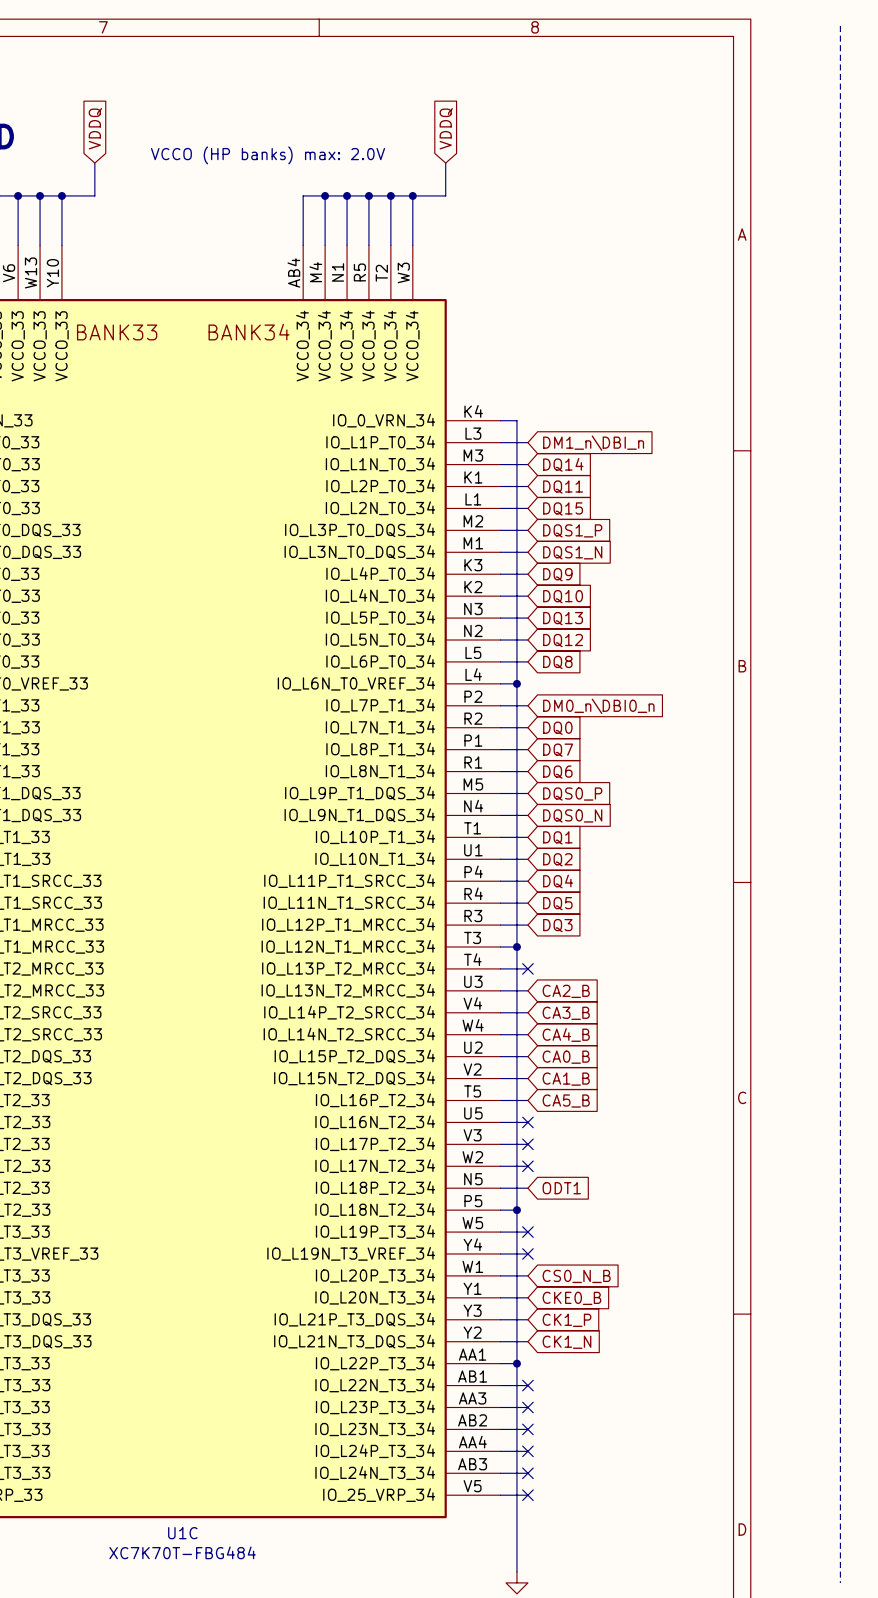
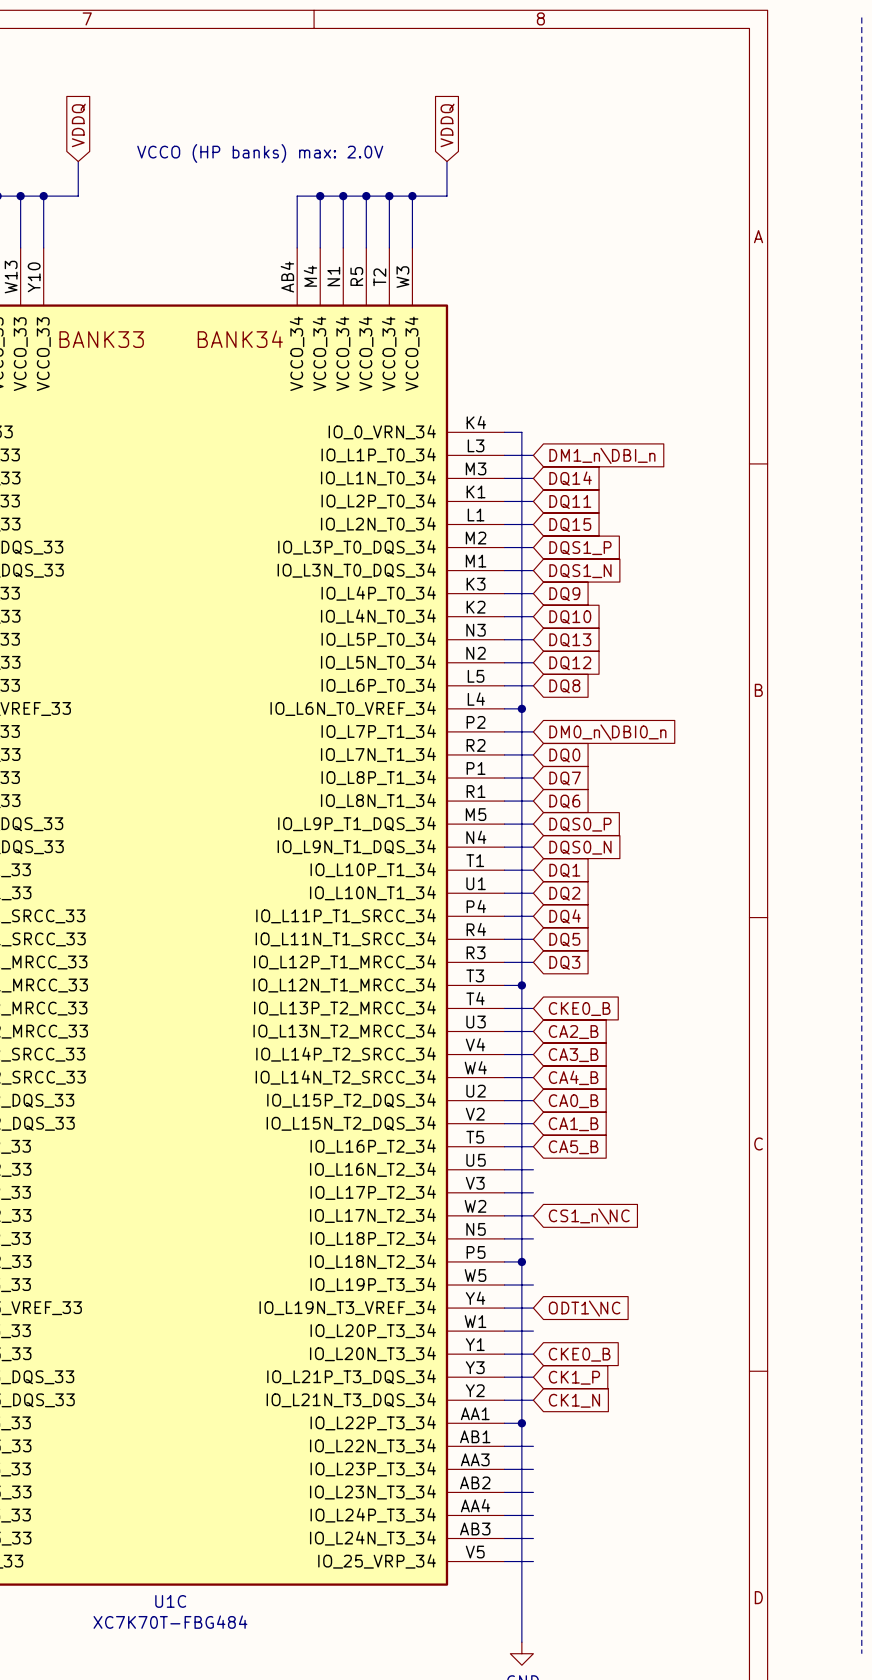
no-connect mark: (527, 968) -> none
global label: none -> CKE0_B (579, 1009)
no-connect mark: (527, 1122) -> none
no-connect mark: (527, 1144) -> none
no-connect mark: (527, 1166) -> none
global label: none -> CS1_n\NC (589, 1216)
global label: ODT1 (561, 1188) -> none
no-connect mark: (527, 1232) -> none
no-connect mark: (527, 1253) -> none
global label: none -> ODT1\NC (584, 1308)
global label: CS0_N_B (576, 1276) -> none
no-connect mark: (527, 1385) -> none
no-connect mark: (527, 1407) -> none
no-connect mark: (527, 1429) -> none
no-connect mark: (527, 1451) -> none
no-connect mark: (527, 1473) -> none
no-connect mark: (527, 1495) -> none

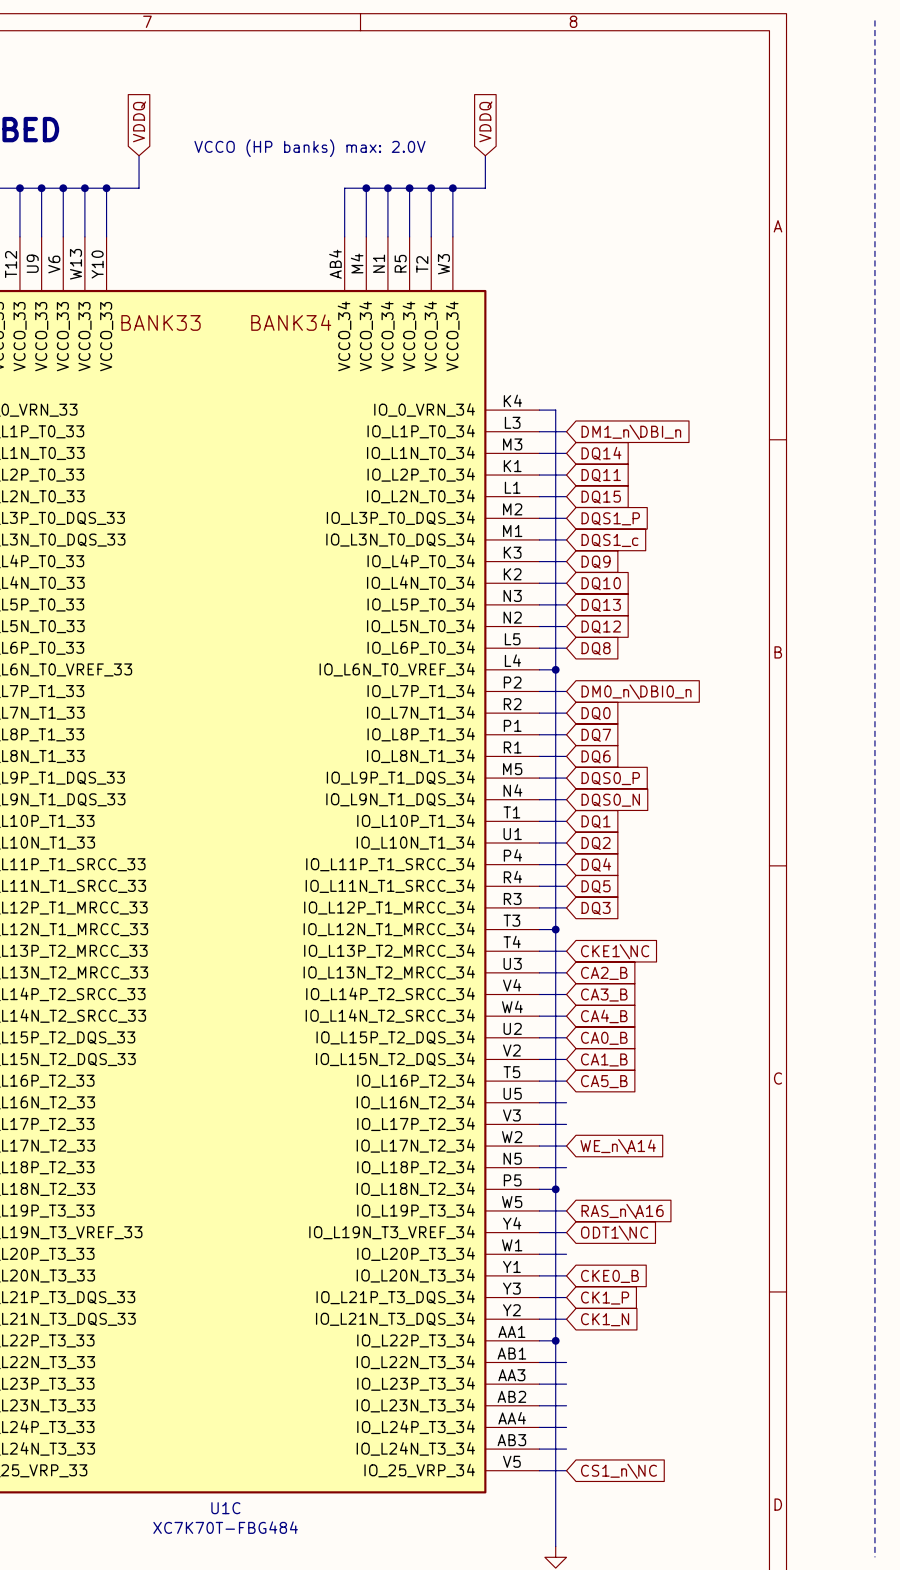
global label: DQS1_N (580, 571) -> DQS1_c (609, 540)
global label: CKE0_B (579, 1009) -> CKE1\NC (615, 951)
global label: CS1_n\NC (589, 1216) -> WE_n\A14 (618, 1146)
global label: none -> RAS_n\A16 (622, 1211)
global label: none -> CS1_n\NC (618, 1471)

